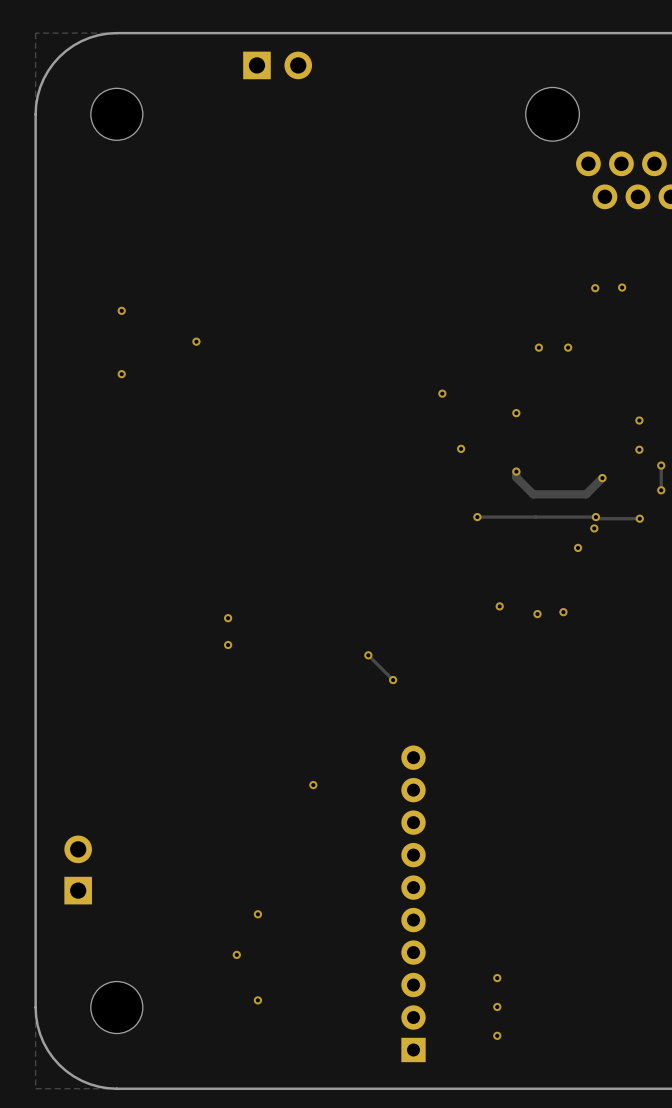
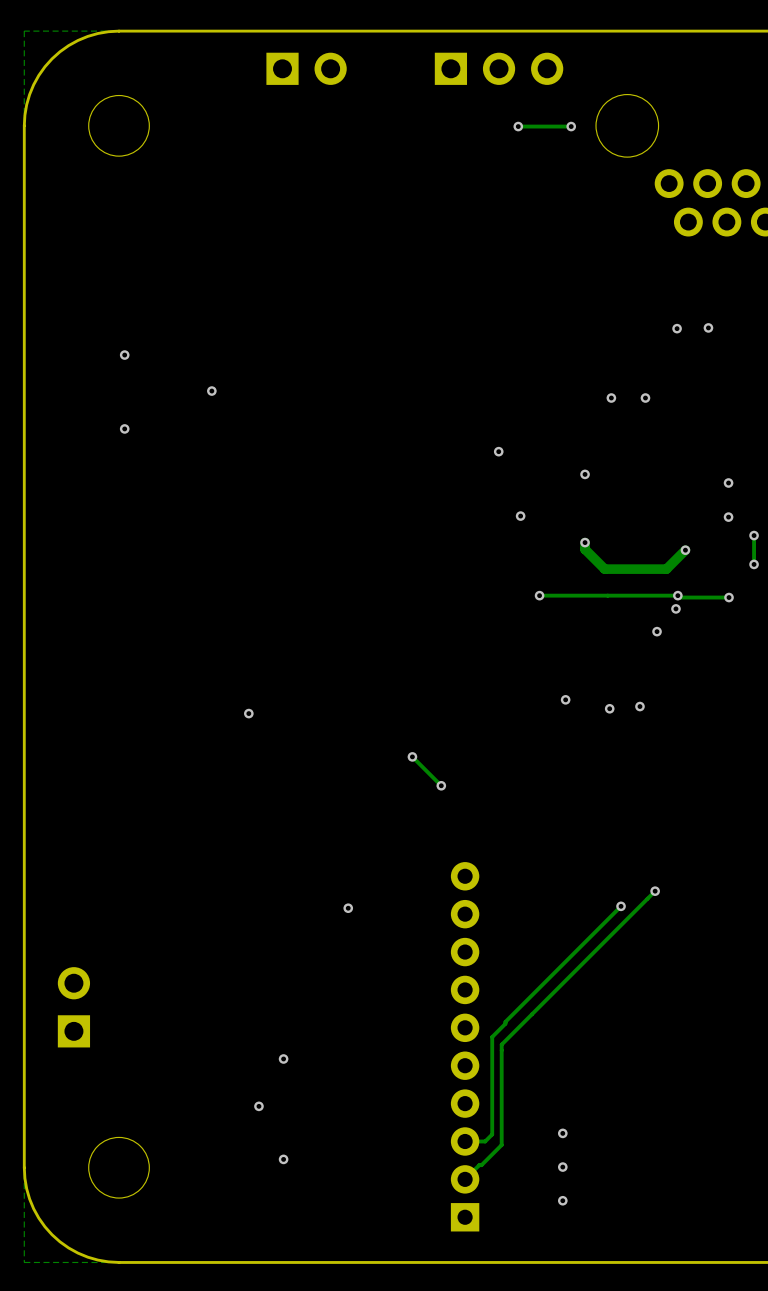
part: none -> (499, 68)
via: none -> (518, 126)
track: none -> (571, 126) (518, 126)
via: none -> (571, 126)
via: (228, 645) -> none
track: none -> (655, 891) (501, 1044) (501, 1145) (465, 1179)
via: none -> (655, 891)
track: none -> (621, 906) (492, 1037) (492, 1134) (485, 1141) (465, 1141)
via: none -> (621, 906)

